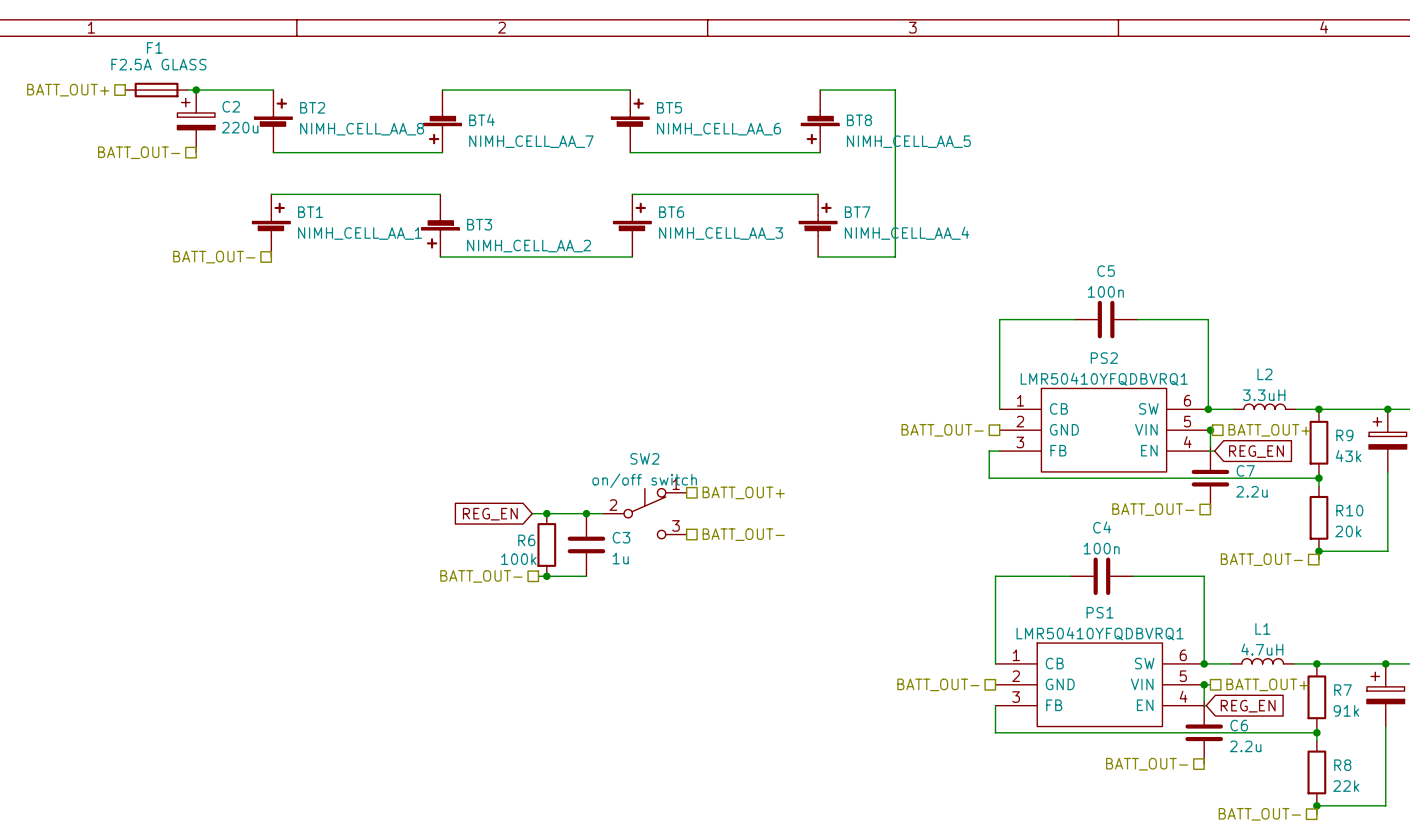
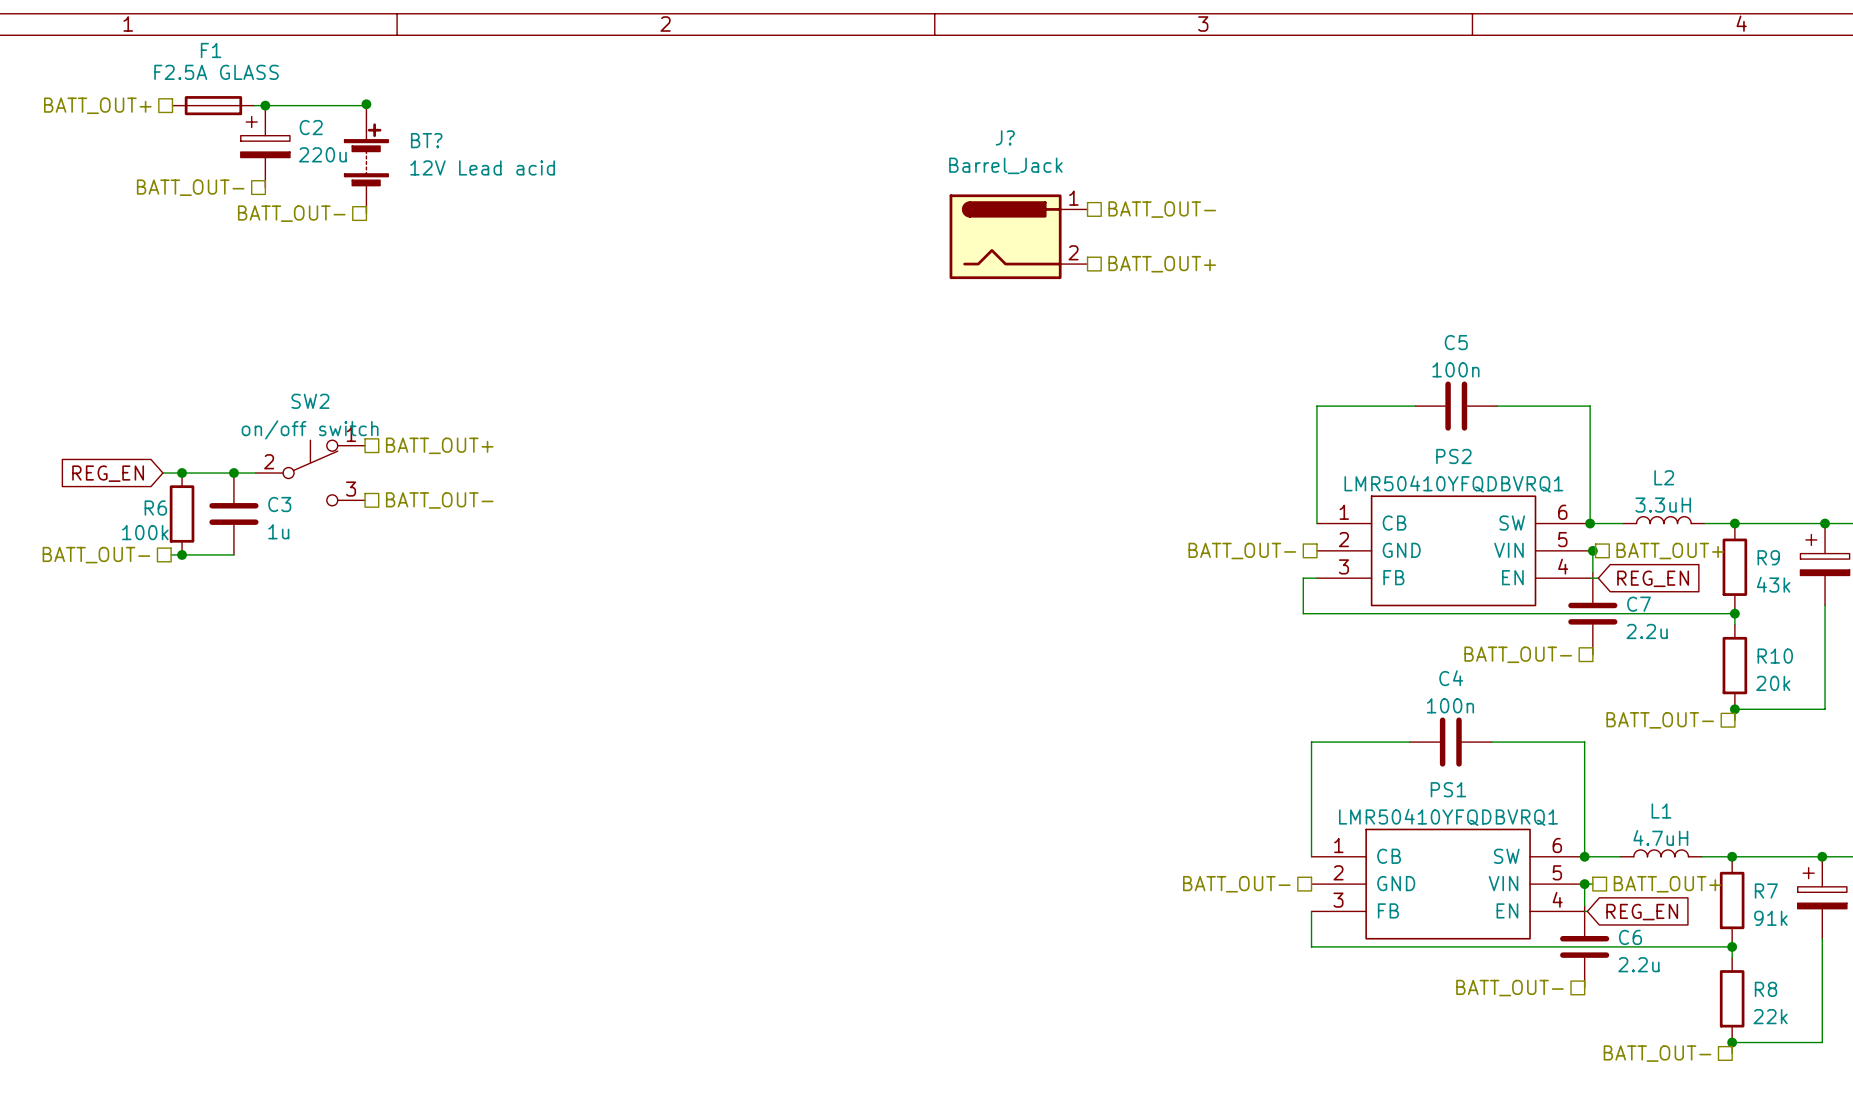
junction: none -> (366, 104)
wire: (442, 90) (630, 90) -> none
wire: (820, 90) (895, 90) (895, 256) (818, 256) -> none
BT2: NIMH_CELL_AA_8 (273, 121) -> none
BT4: NIMH_CELL_AA_7 (442, 121) -> none
BT5: NIMH_CELL_AA_6 (630, 121) -> none
BT8: NIMH_CELL_AA_5 (820, 121) -> none
BT?: none -> 12V Lead acid (366, 158)
wire: (273, 152) (442, 152) -> none
wire: (630, 152) (820, 152) -> none
hierarchical label: none -> BATT_OUT- (1162, 209)
hierarchical label: none -> BATT_OUT- (291, 213)
J?: none -> Barrel_Jack (1018, 236)
wire: (271, 194) (440, 194) -> none
wire: (632, 194) (818, 194) -> none
hierarchical label: none -> BATT_OUT+ (1162, 264)
BT1: NIMH_CELL_AA_1 (271, 225) -> none
BT3: NIMH_CELL_AA_2 (440, 225) -> none
BT6: NIMH_CELL_AA_3 (632, 225) -> none
BT7: NIMH_CELL_AA_4 (818, 225) -> none
wire: (440, 256) (632, 256) -> none
hierarchical label: BATT_OUT- (214, 257) -> none
hierarchical label: none -> BATT_OUT+ (439, 445)
wire: none -> (162, 473) (255, 473)
junction: none -> (182, 473)
junction: none -> (233, 473)
global label: none -> REG_EN (108, 473)
hierarchical label: none -> BATT_OUT- (439, 500)
hierarchical label: none -> BATT_OUT- (96, 555)
wire: none -> (171, 554) (233, 554)
junction: none -> (182, 554)
hierarchical label: BATT_OUT+ (743, 492) -> none
wire: (532, 513) (603, 513) -> none
junction: (546, 513) -> none
junction: (586, 513) -> none
SW2 position: (644, 513) -> (310, 473)
global label: REG_EN (490, 514) -> none
hierarchical label: BATT_OUT- (743, 534) -> none
R6 position: (546, 544) -> (182, 513)
C3 position: (586, 544) -> (233, 513)
hierarchical label: BATT_OUT- (481, 576) -> none
wire: (538, 576) (586, 576) -> none
junction: (546, 576) -> none

